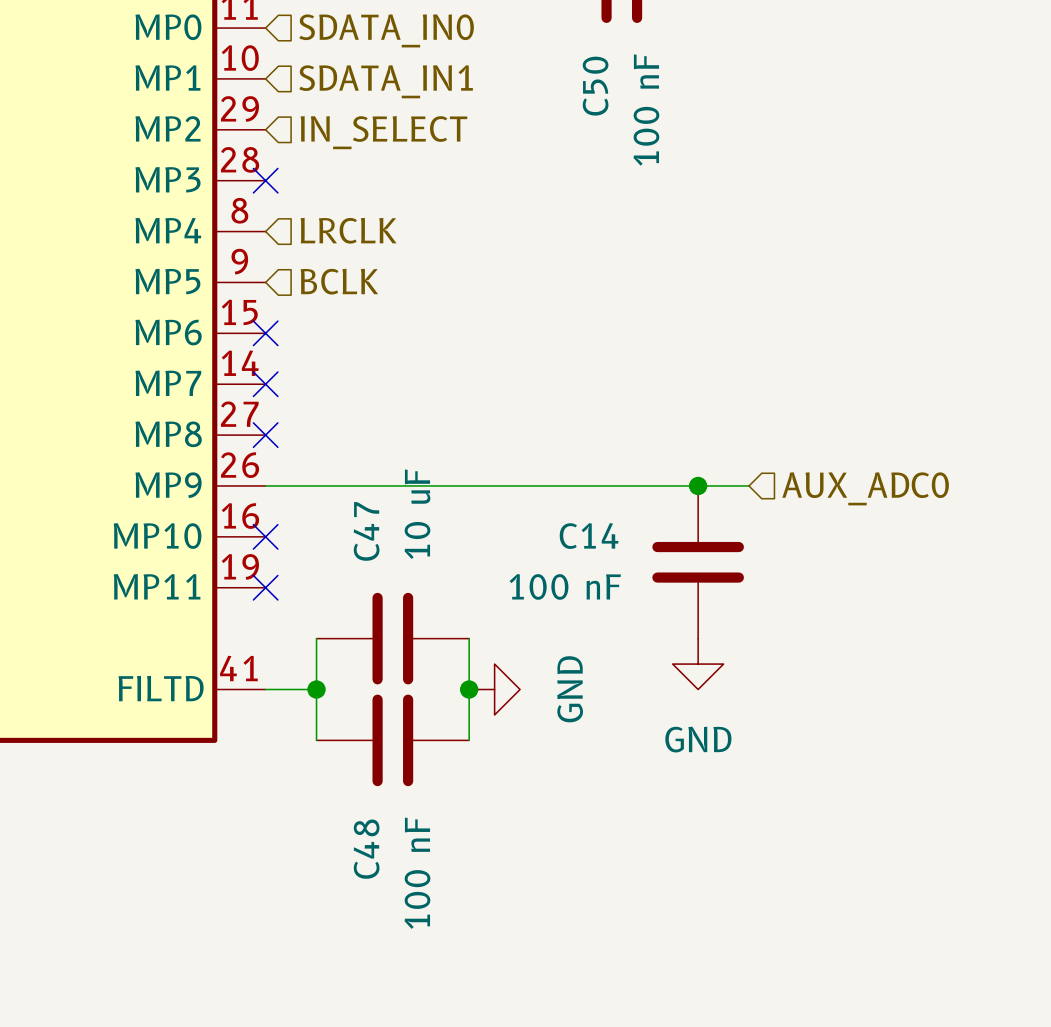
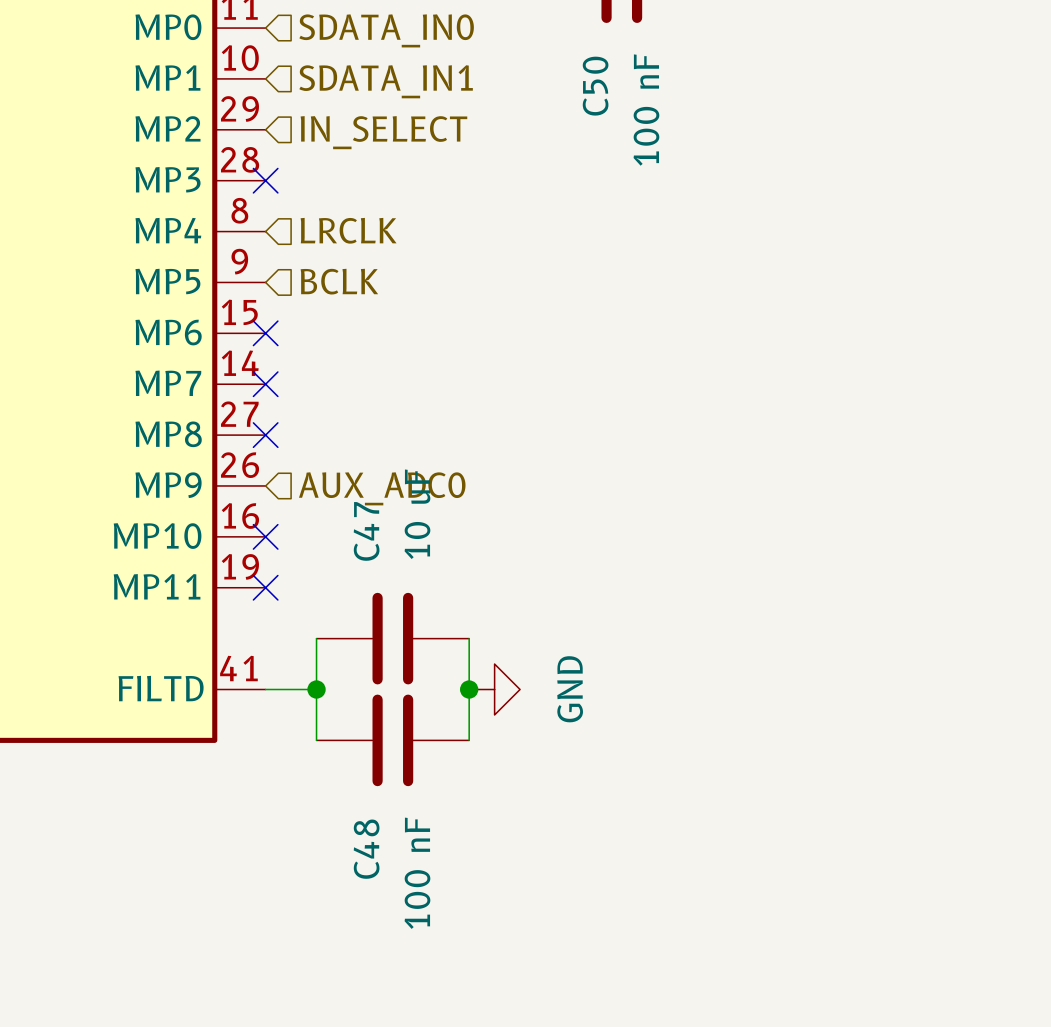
wire: (265, 485) (749, 485) -> none
junction: (698, 485) -> none
hierarchical label position: AUX_ADC0 (865, 488) -> AUX_ADC0 (382, 488)
C14: 100 nF (698, 562) -> none
power symbol: GND (698, 664) -> none

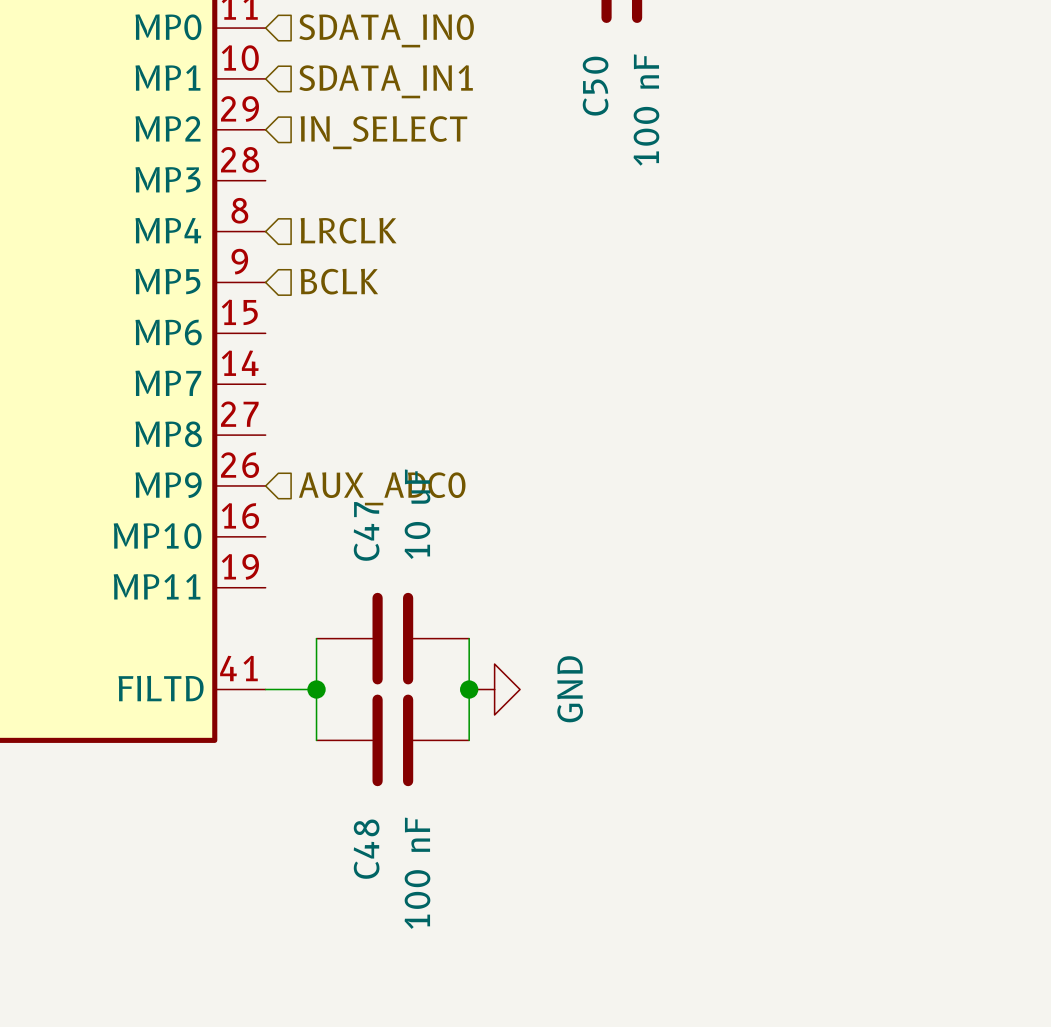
no-connect mark: (265, 180) -> none
no-connect mark: (265, 333) -> none
no-connect mark: (265, 384) -> none
no-connect mark: (265, 435) -> none
no-connect mark: (265, 536) -> none
no-connect mark: (265, 587) -> none

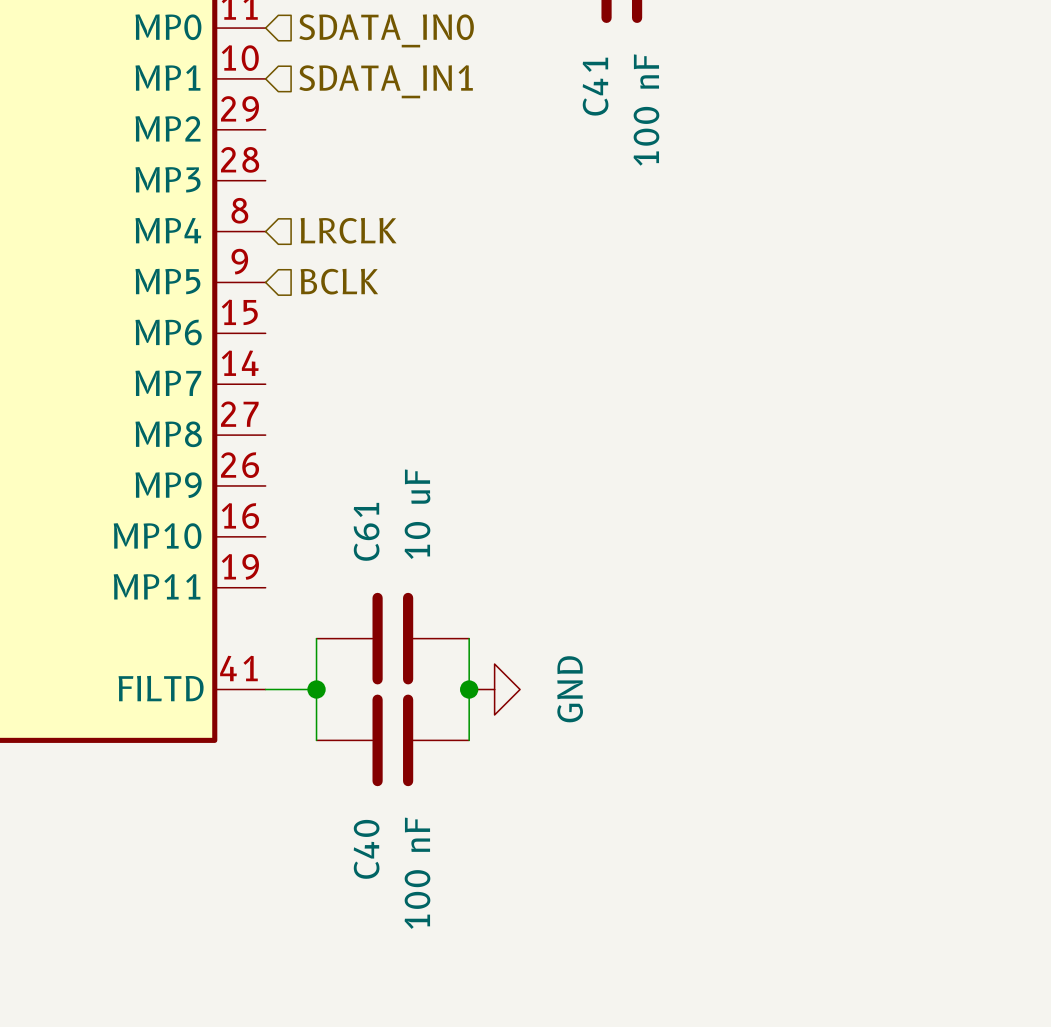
C50 name: C50 (595, 86) -> C41 (595, 86)
hierarchical label: IN_SELECT (383, 132) -> none
hierarchical label: AUX_ADC0 (382, 488) -> none
C47 name: C47 (366, 531) -> C61 (366, 531)
C48 name: C48 (366, 849) -> C40 (366, 849)

